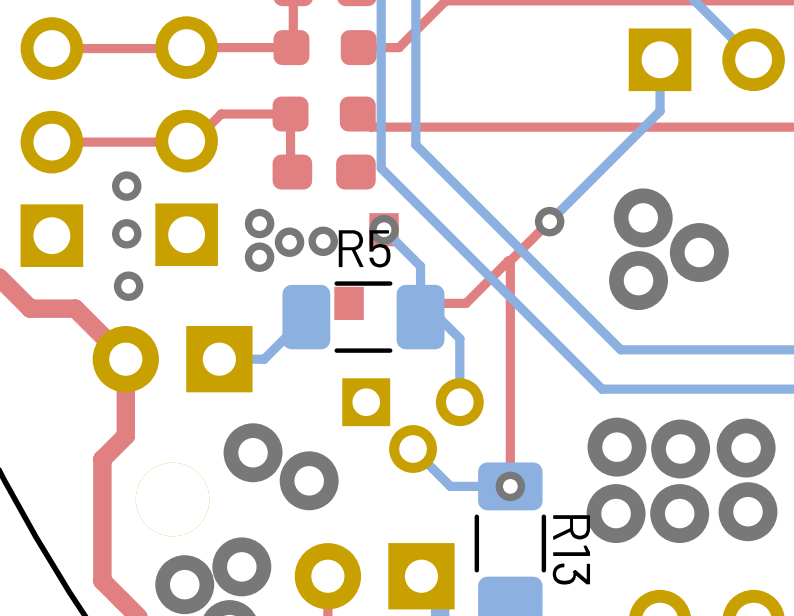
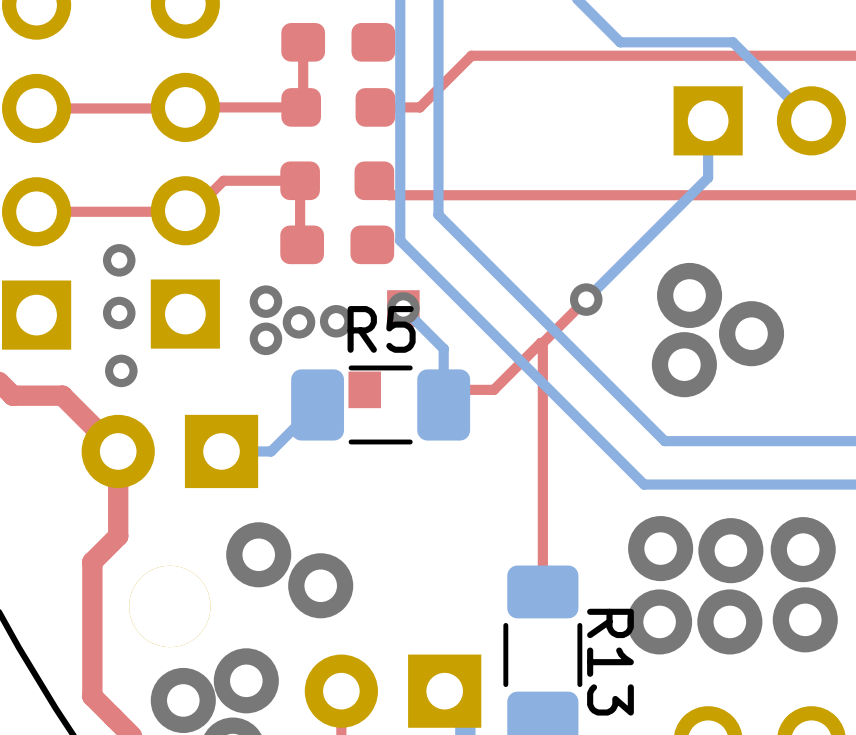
bottom track: (420, 317) (438, 317) (459, 338) (459, 402) -> none
part: (413, 425) -> none
bottom track: (413, 449) (450, 486) (510, 486) -> none
via: (510, 486) -> none

